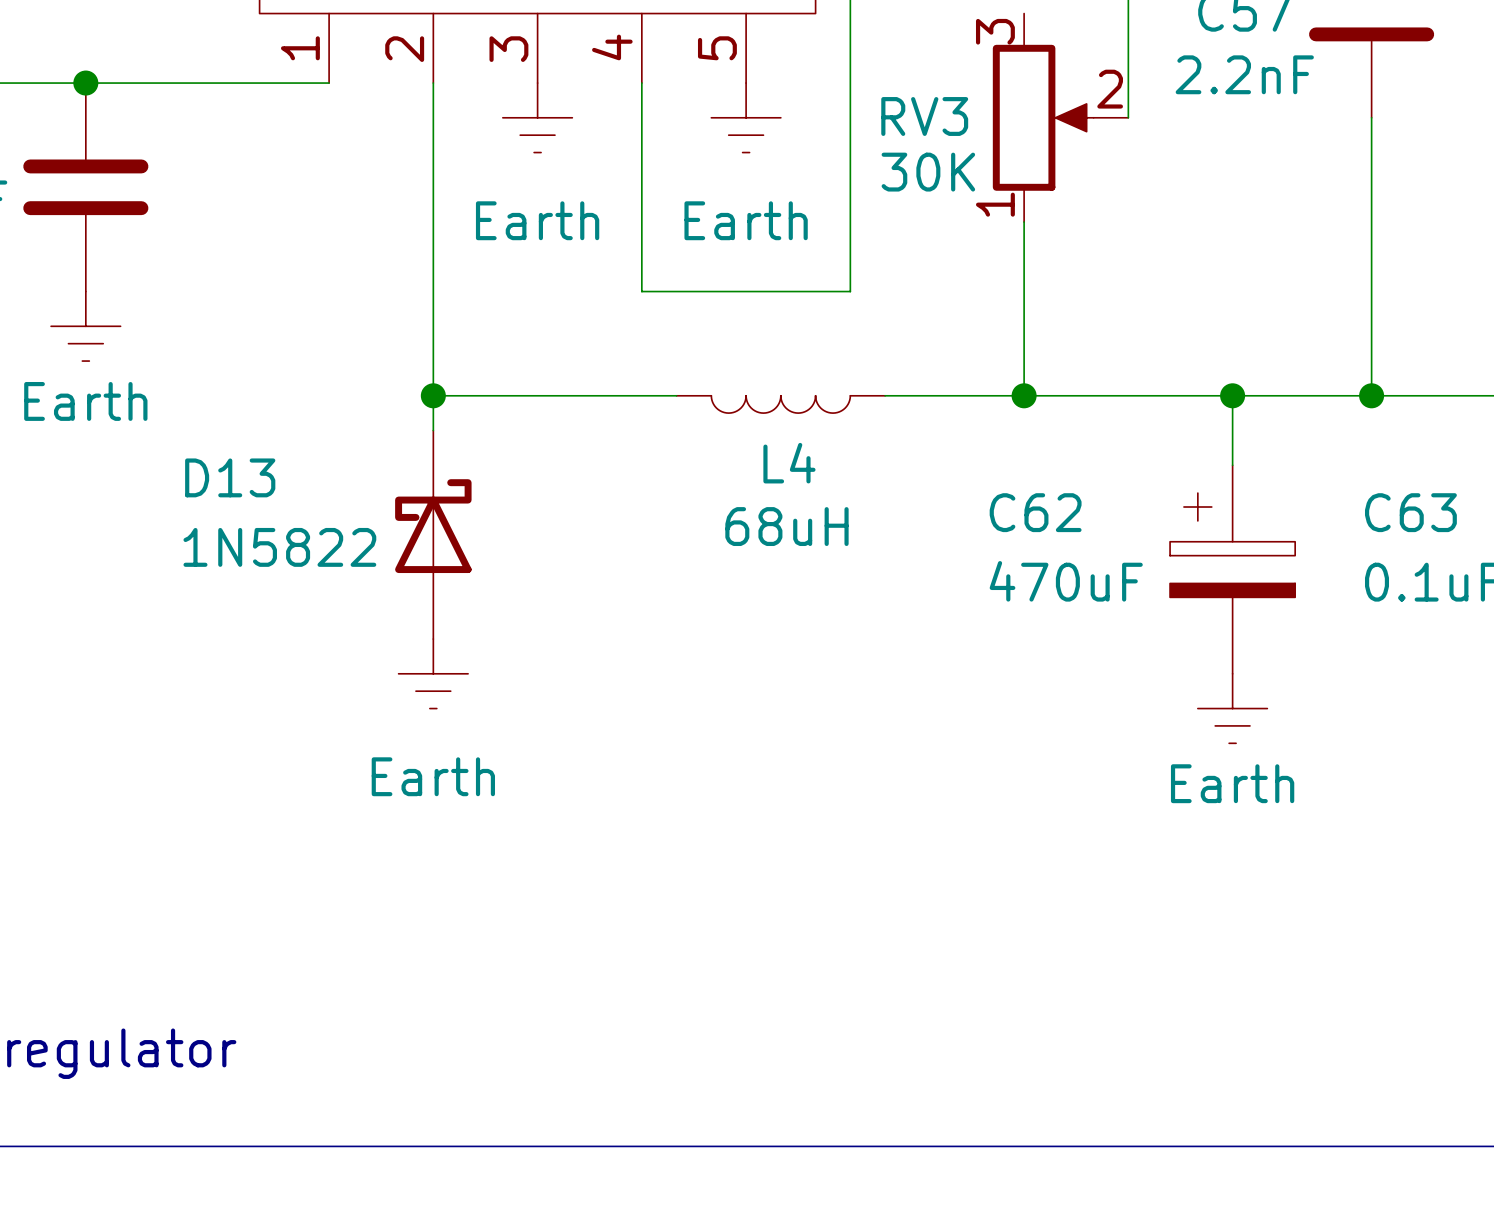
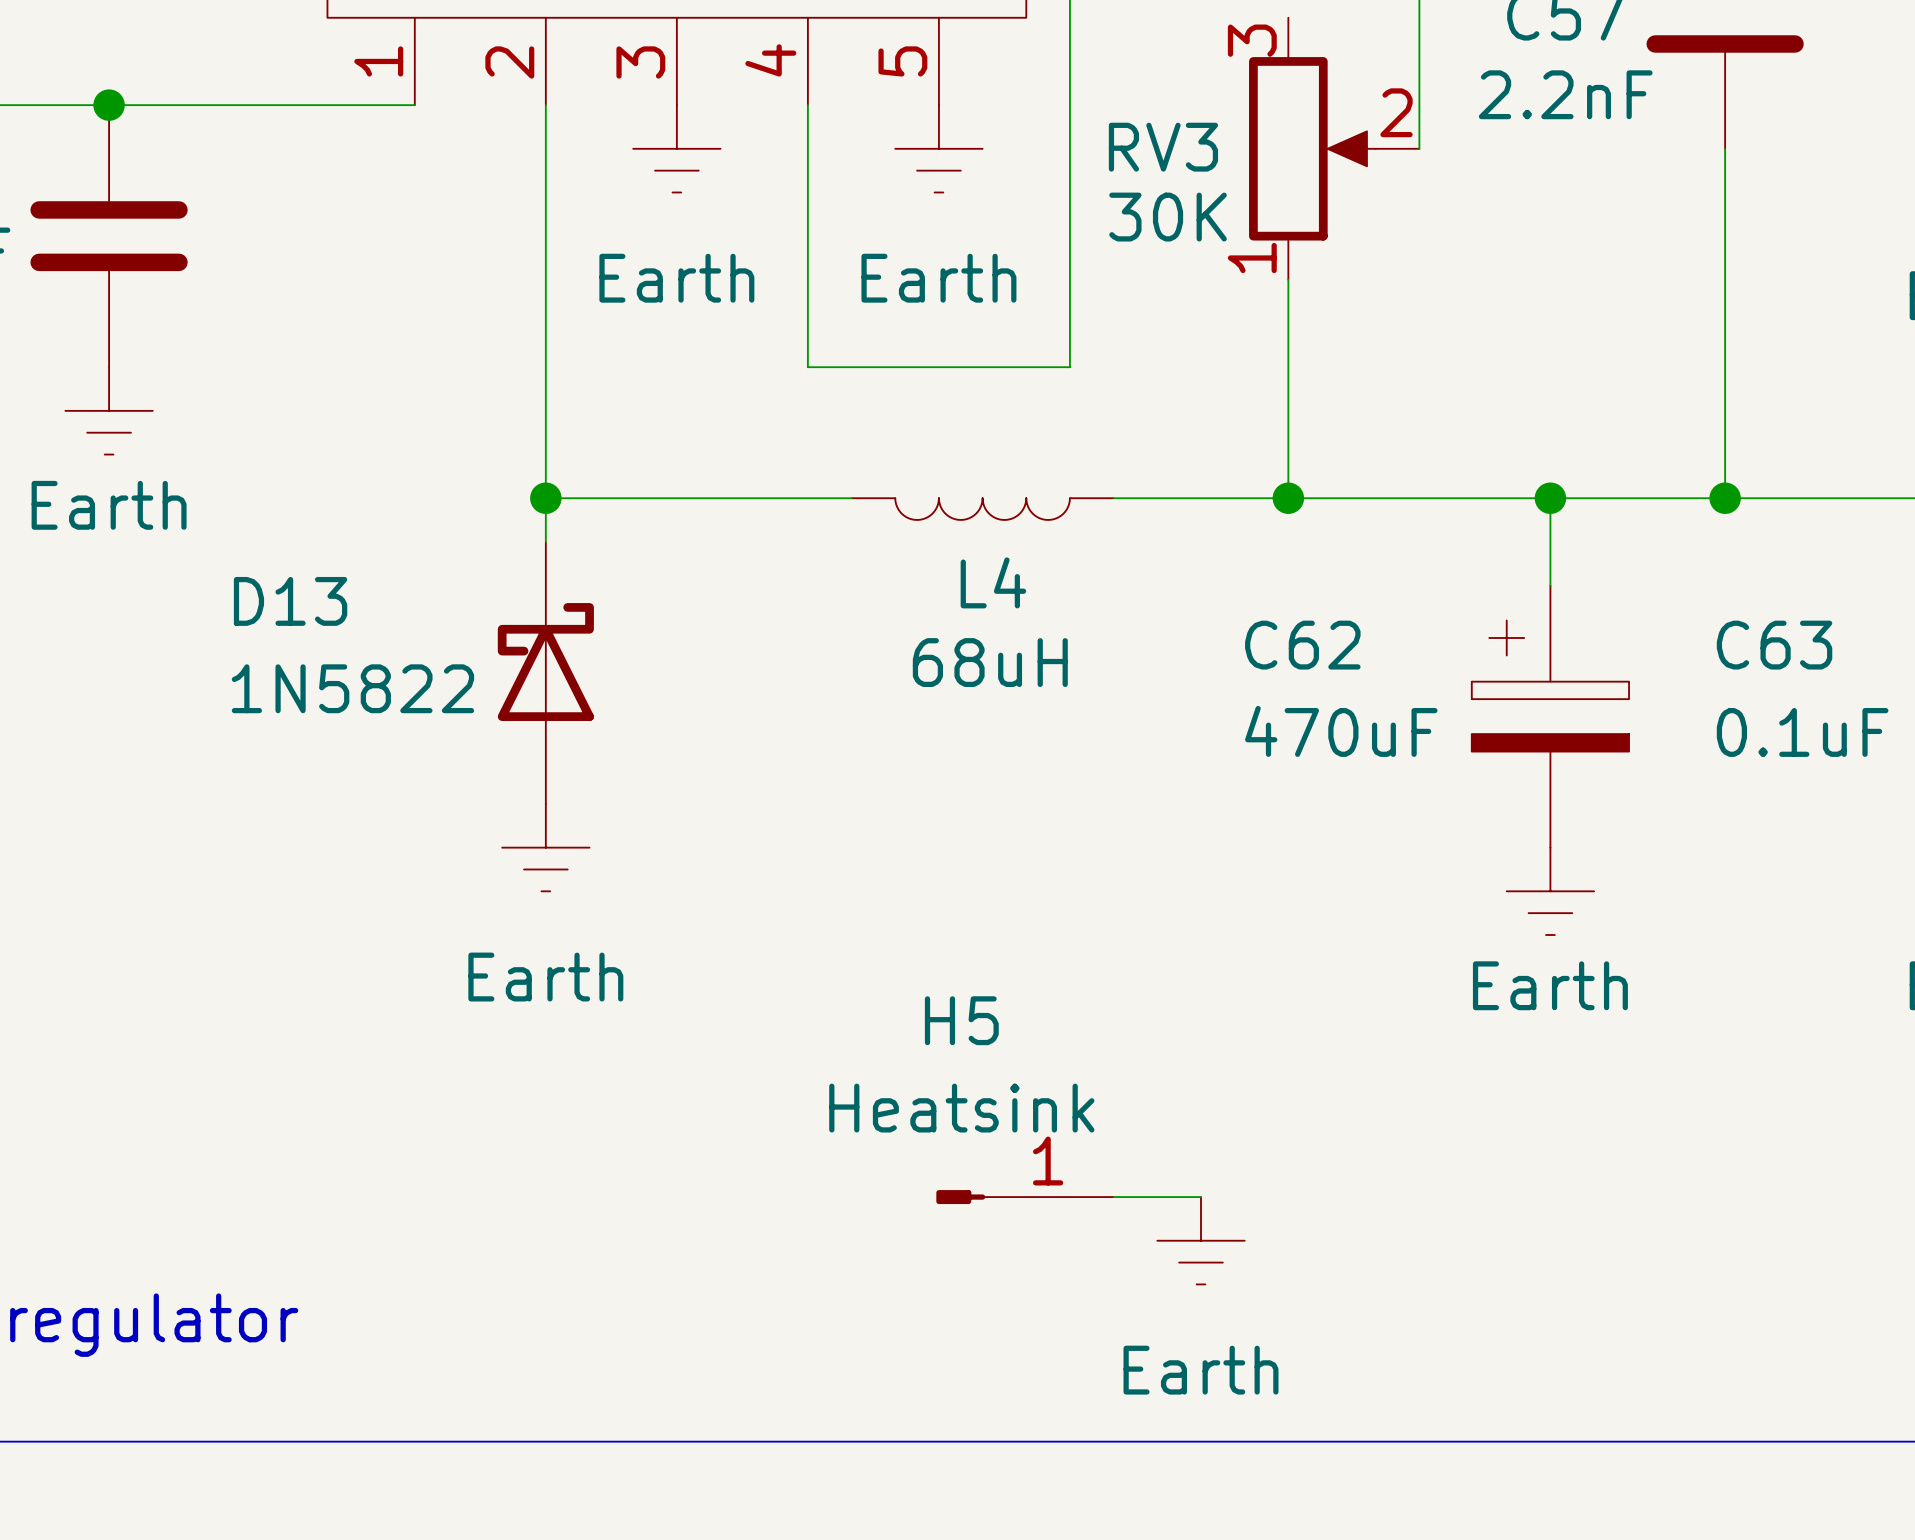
H5: none -> Heatsink (1024, 1197)
wire: none -> (1113, 1197) (1201, 1197)
power symbol: none -> Earth (1201, 1240)

